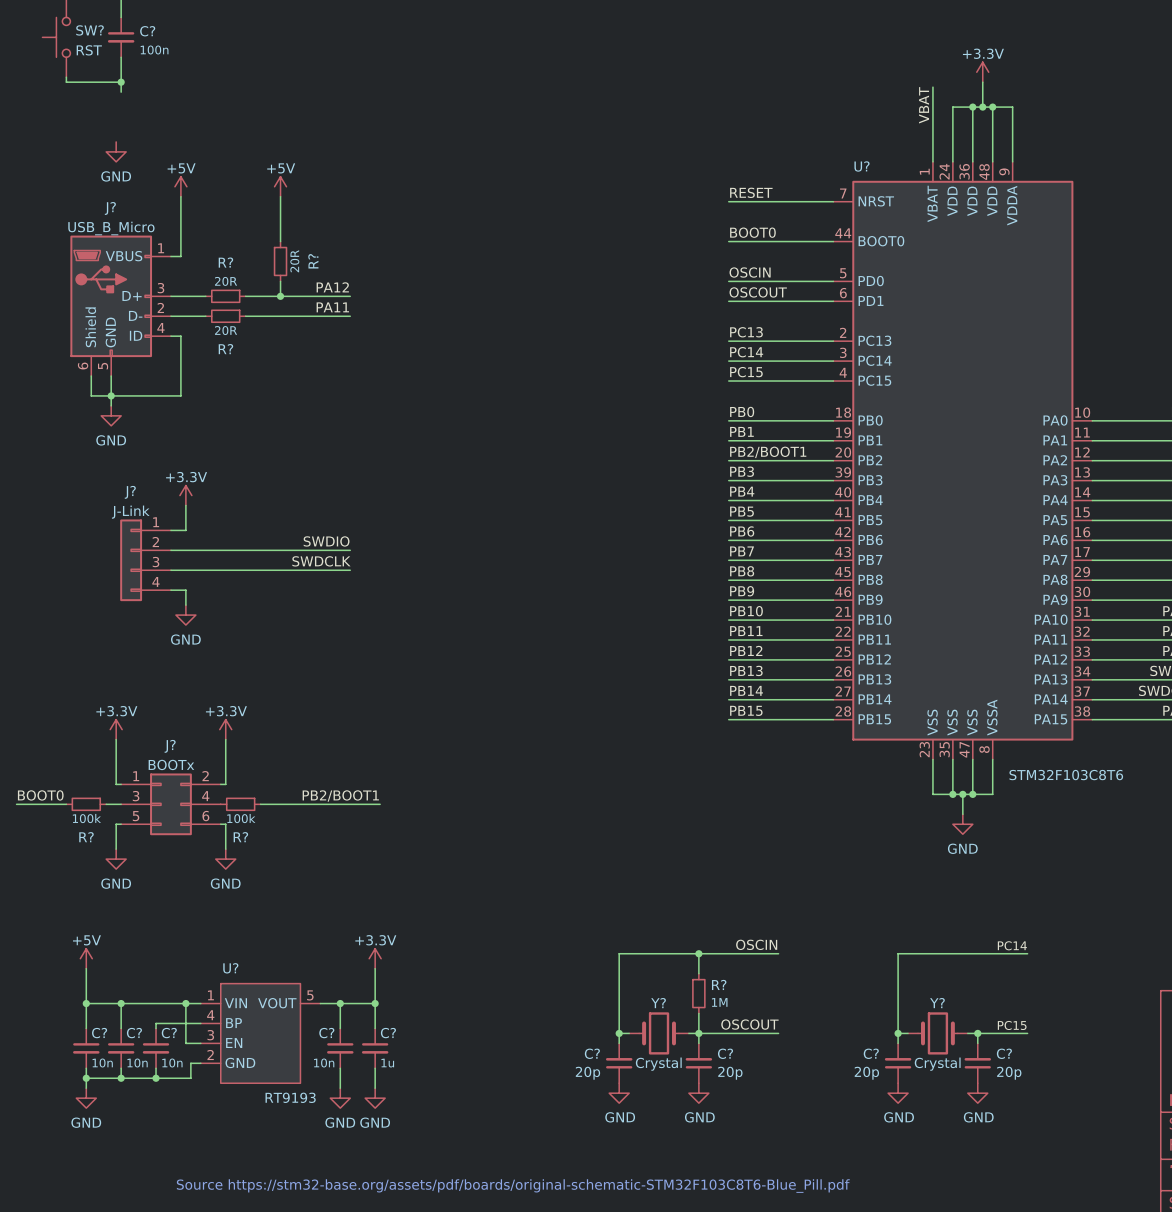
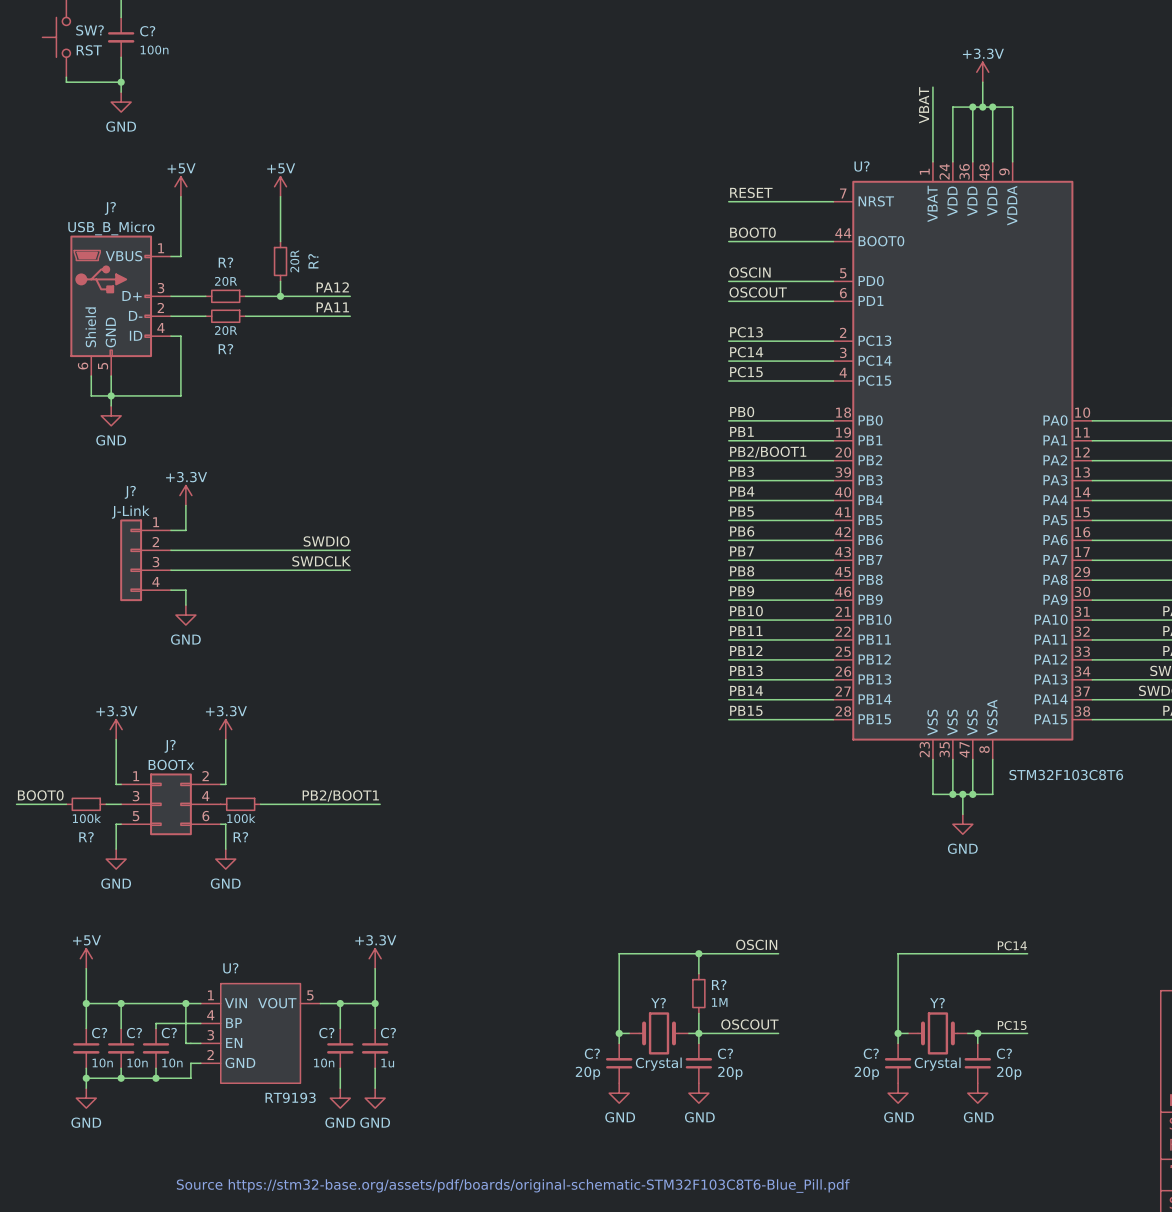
power symbol position: GND (116, 151) -> GND (121, 102)

